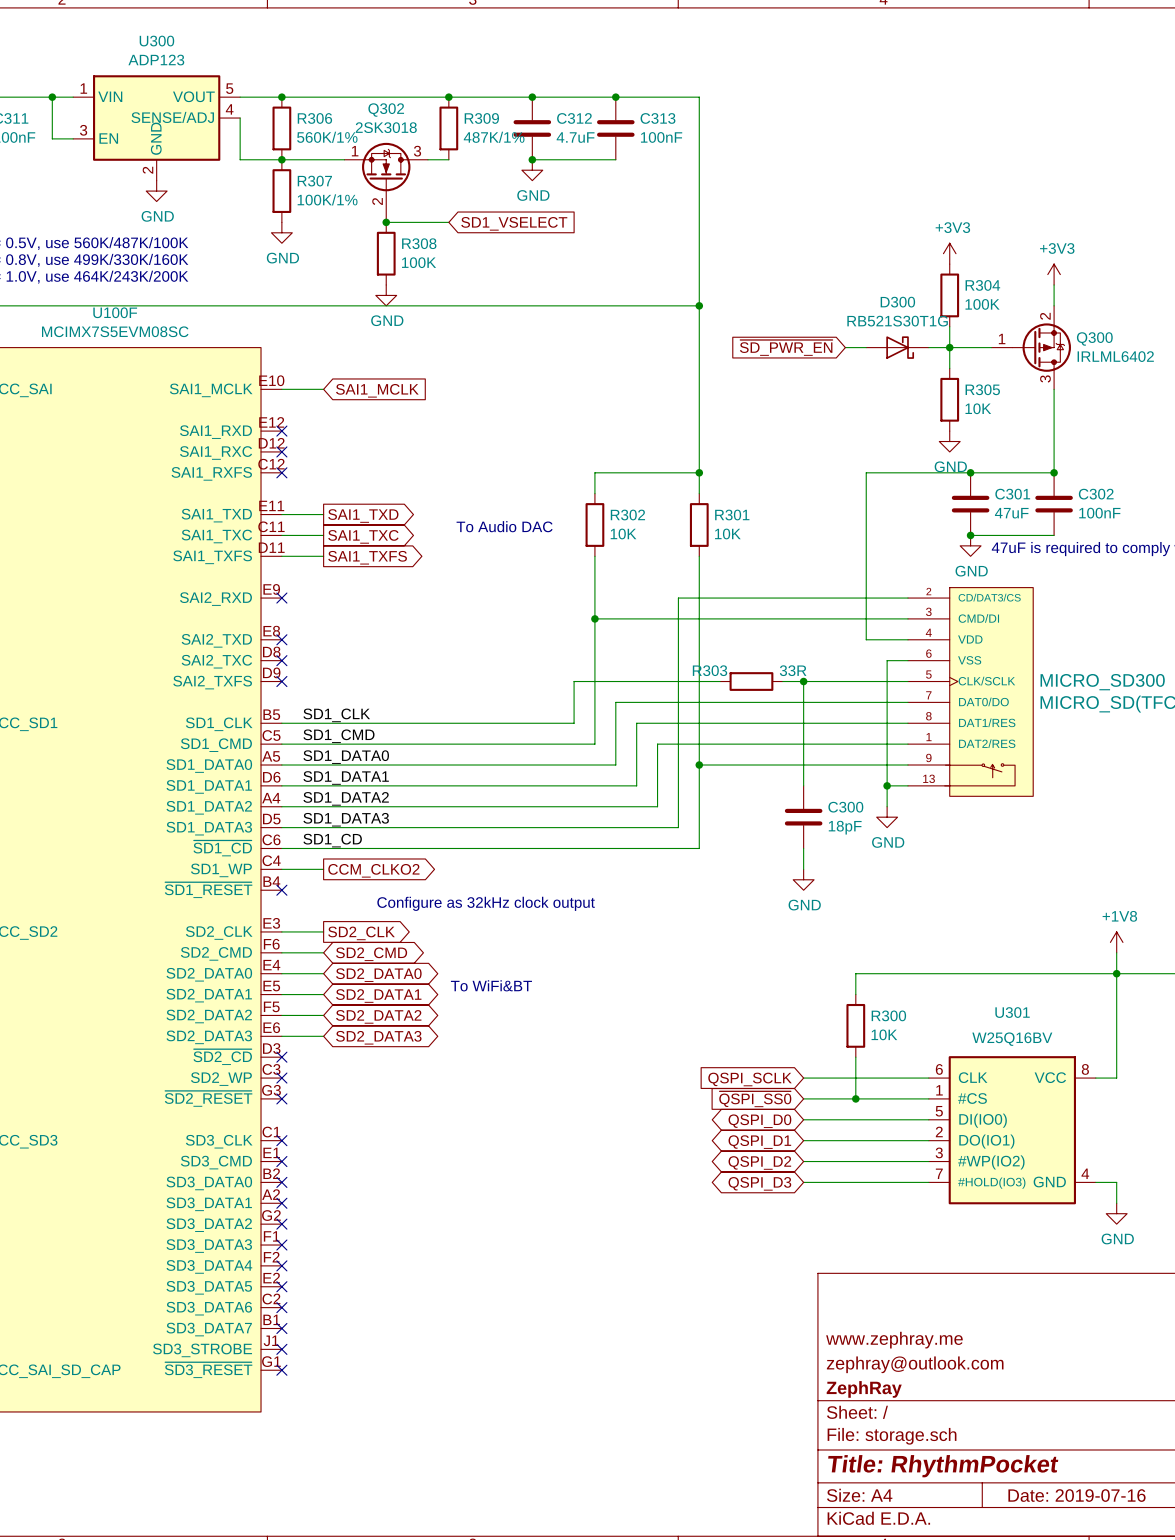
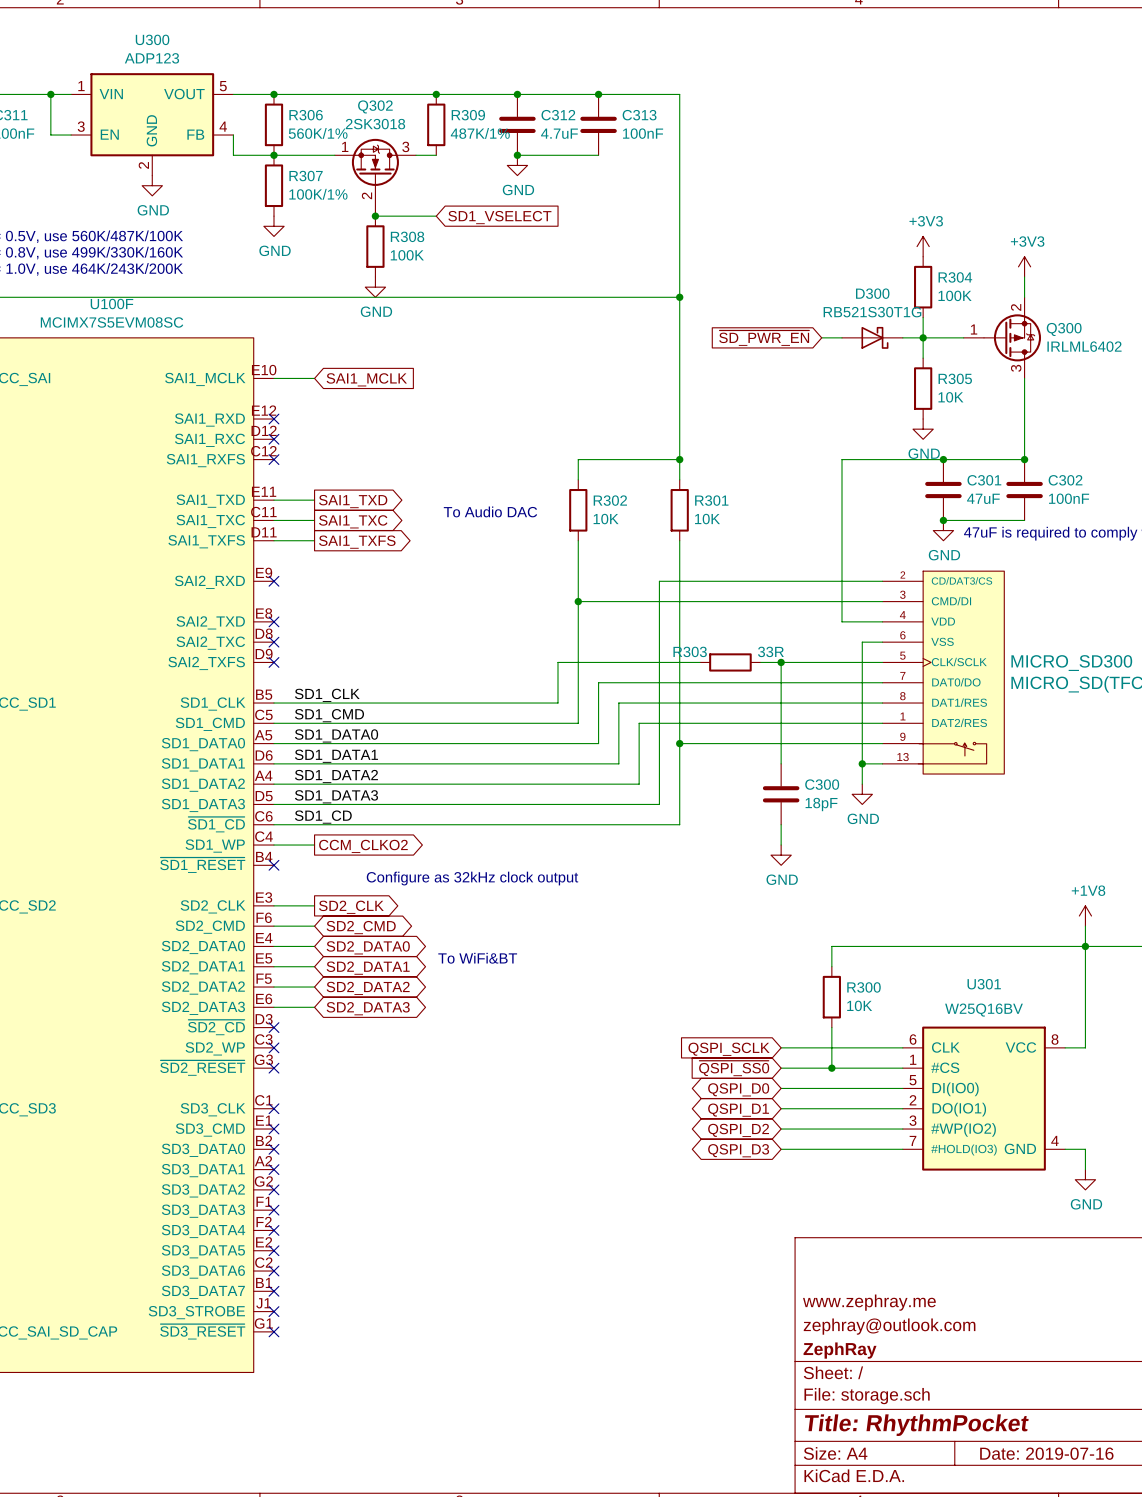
U300 symbol: [73, 75, 241, 181] -> [71, 73, 234, 176]
wire: (240, 118) (240, 138) -> none

